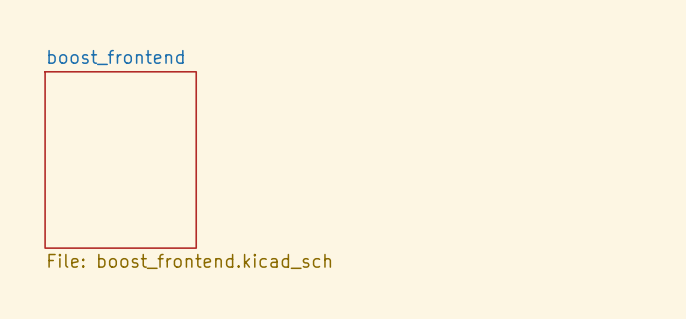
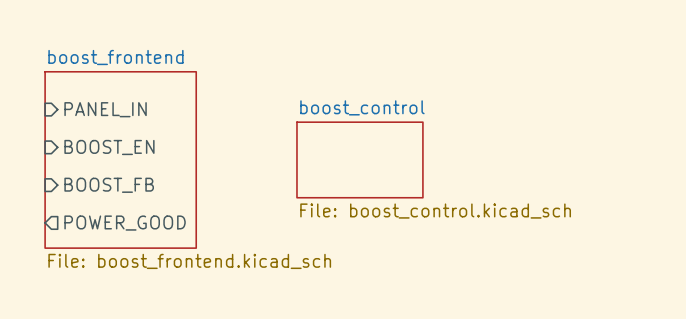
sheet pin: none -> PANEL_IN (105, 109)
sheet pin: none -> BOOST_EN (109, 147)
sheet boost_control: none -> File: boost_control.kicad_sch (359, 159)
sheet pin: none -> BOOST_FB (109, 185)
sheet pin: none -> POWER_GOOD (125, 223)

